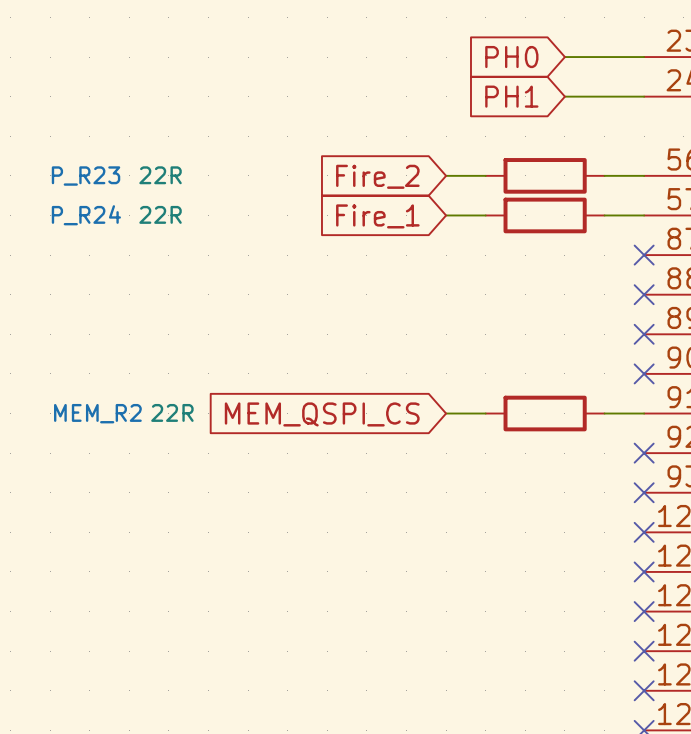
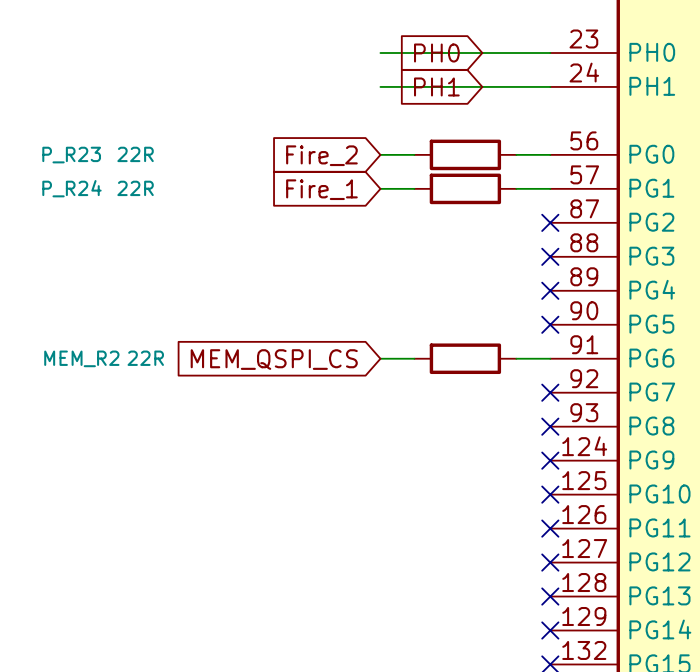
wire: none -> (380, 53) (482, 53)
wire: none -> (380, 86) (482, 86)

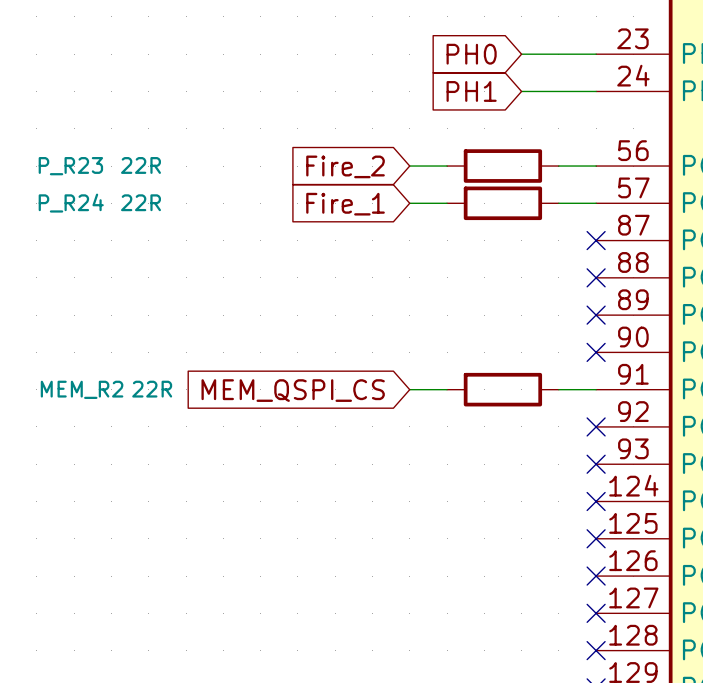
wire: (380, 53) (482, 53) -> none
wire: (380, 86) (482, 86) -> none

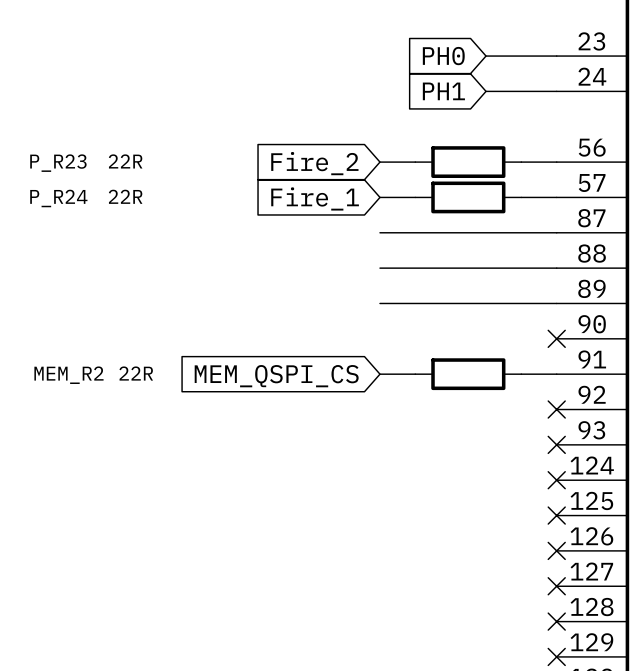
wire: none -> (379, 232) (556, 232)
no-connect mark: (596, 240) -> none
wire: none -> (379, 268) (556, 268)
no-connect mark: (596, 277) -> none
wire: none -> (379, 303) (556, 303)
no-connect mark: (596, 315) -> none

